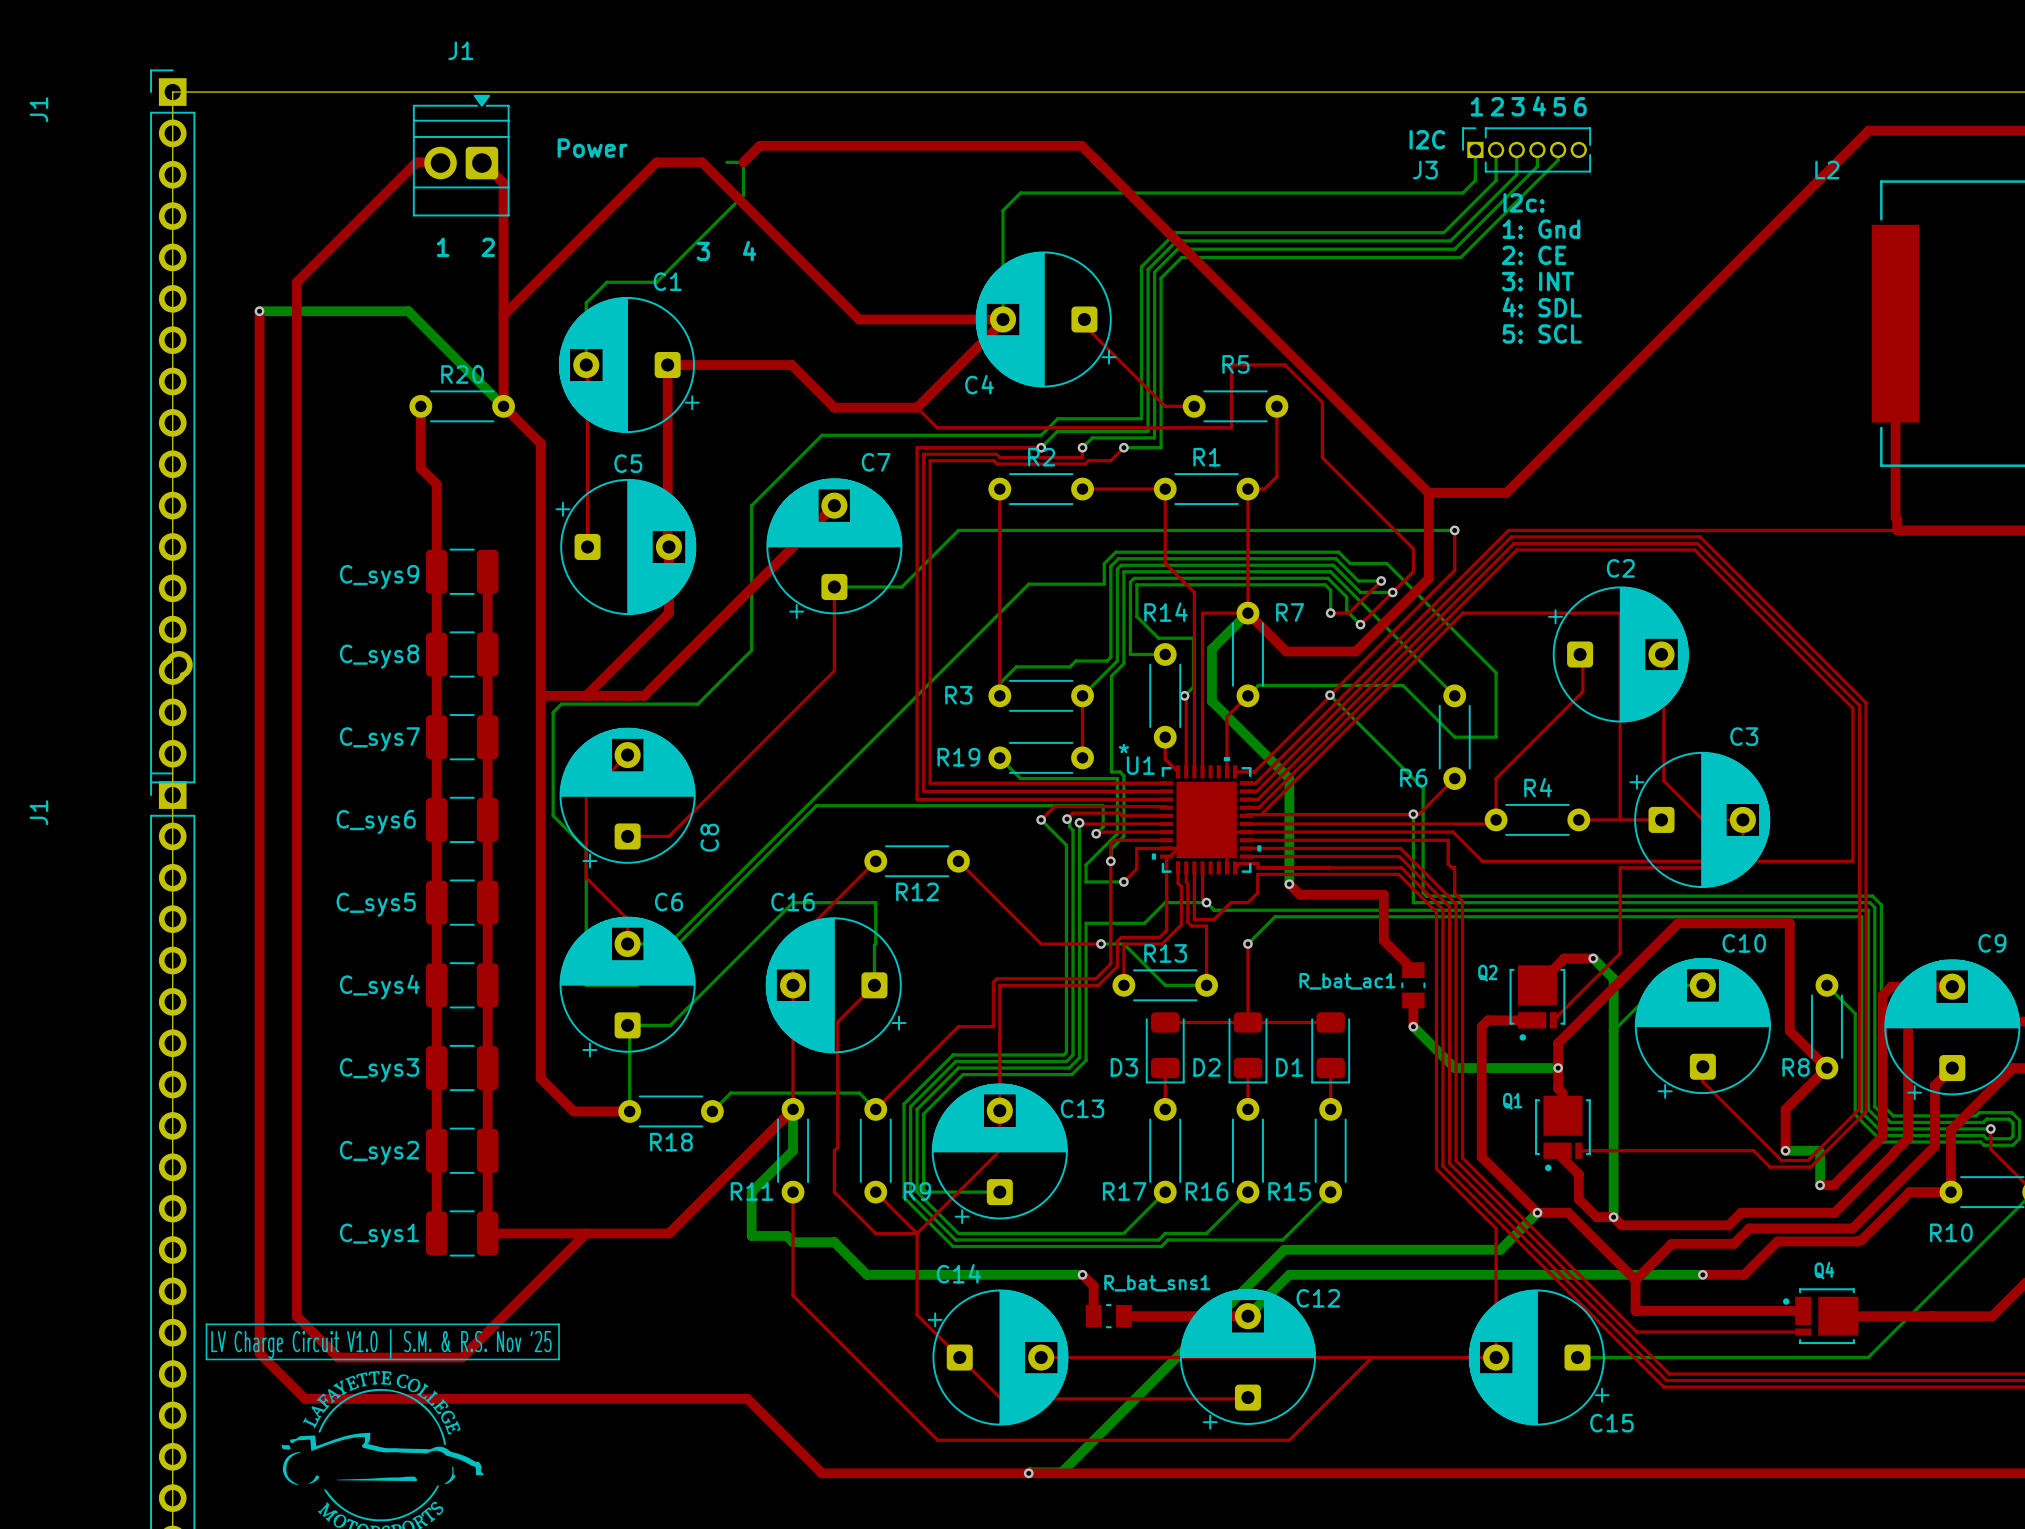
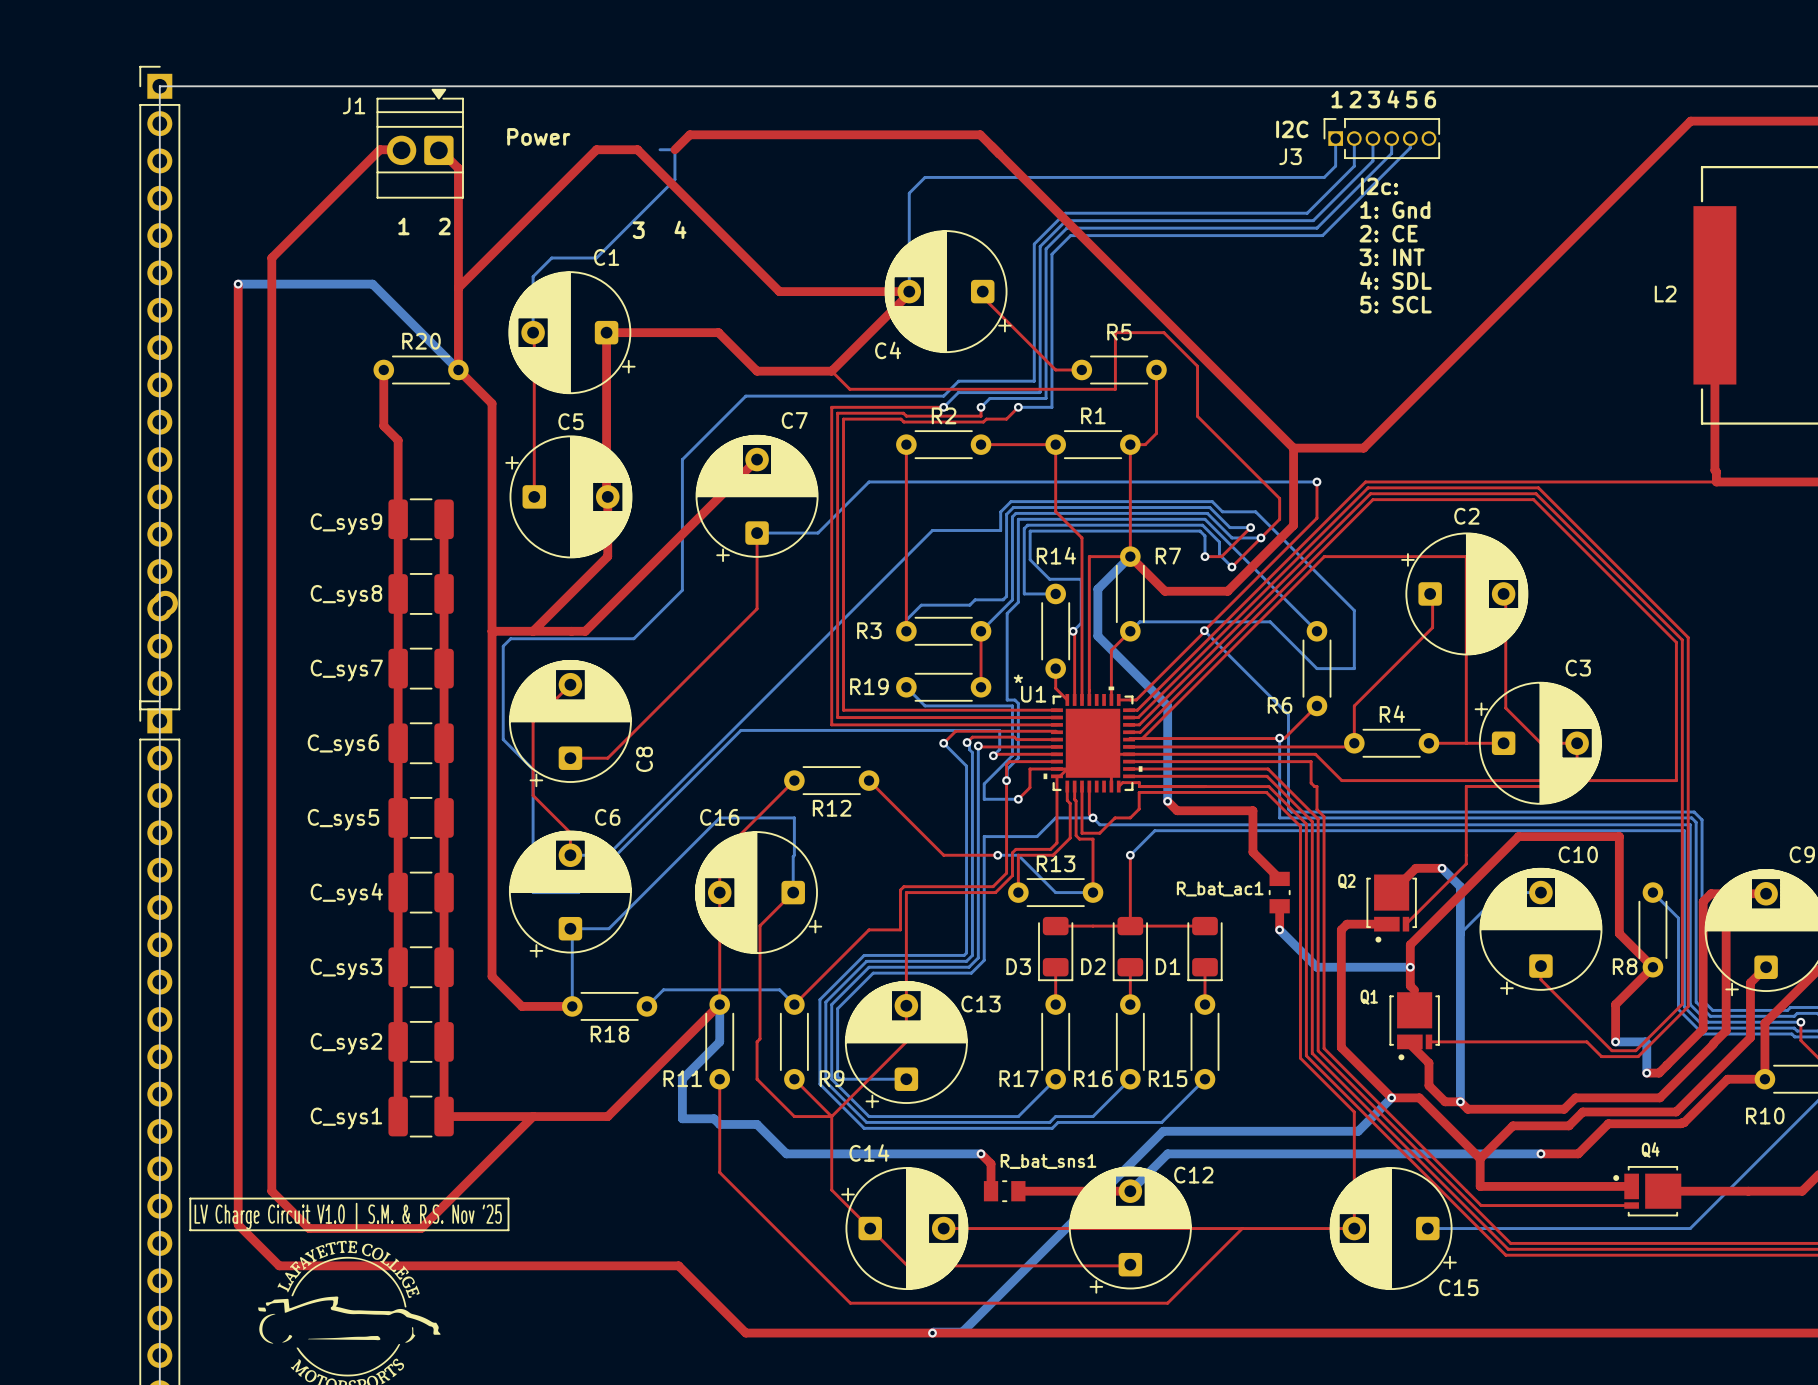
J1 name position: J1 (460, 50) -> J1 (354, 105)
J1 name: J1 (38, 109) -> none
L2 name position: L2 (1827, 170) -> L2 (1665, 293)
J1 name: J1 (38, 812) -> none

